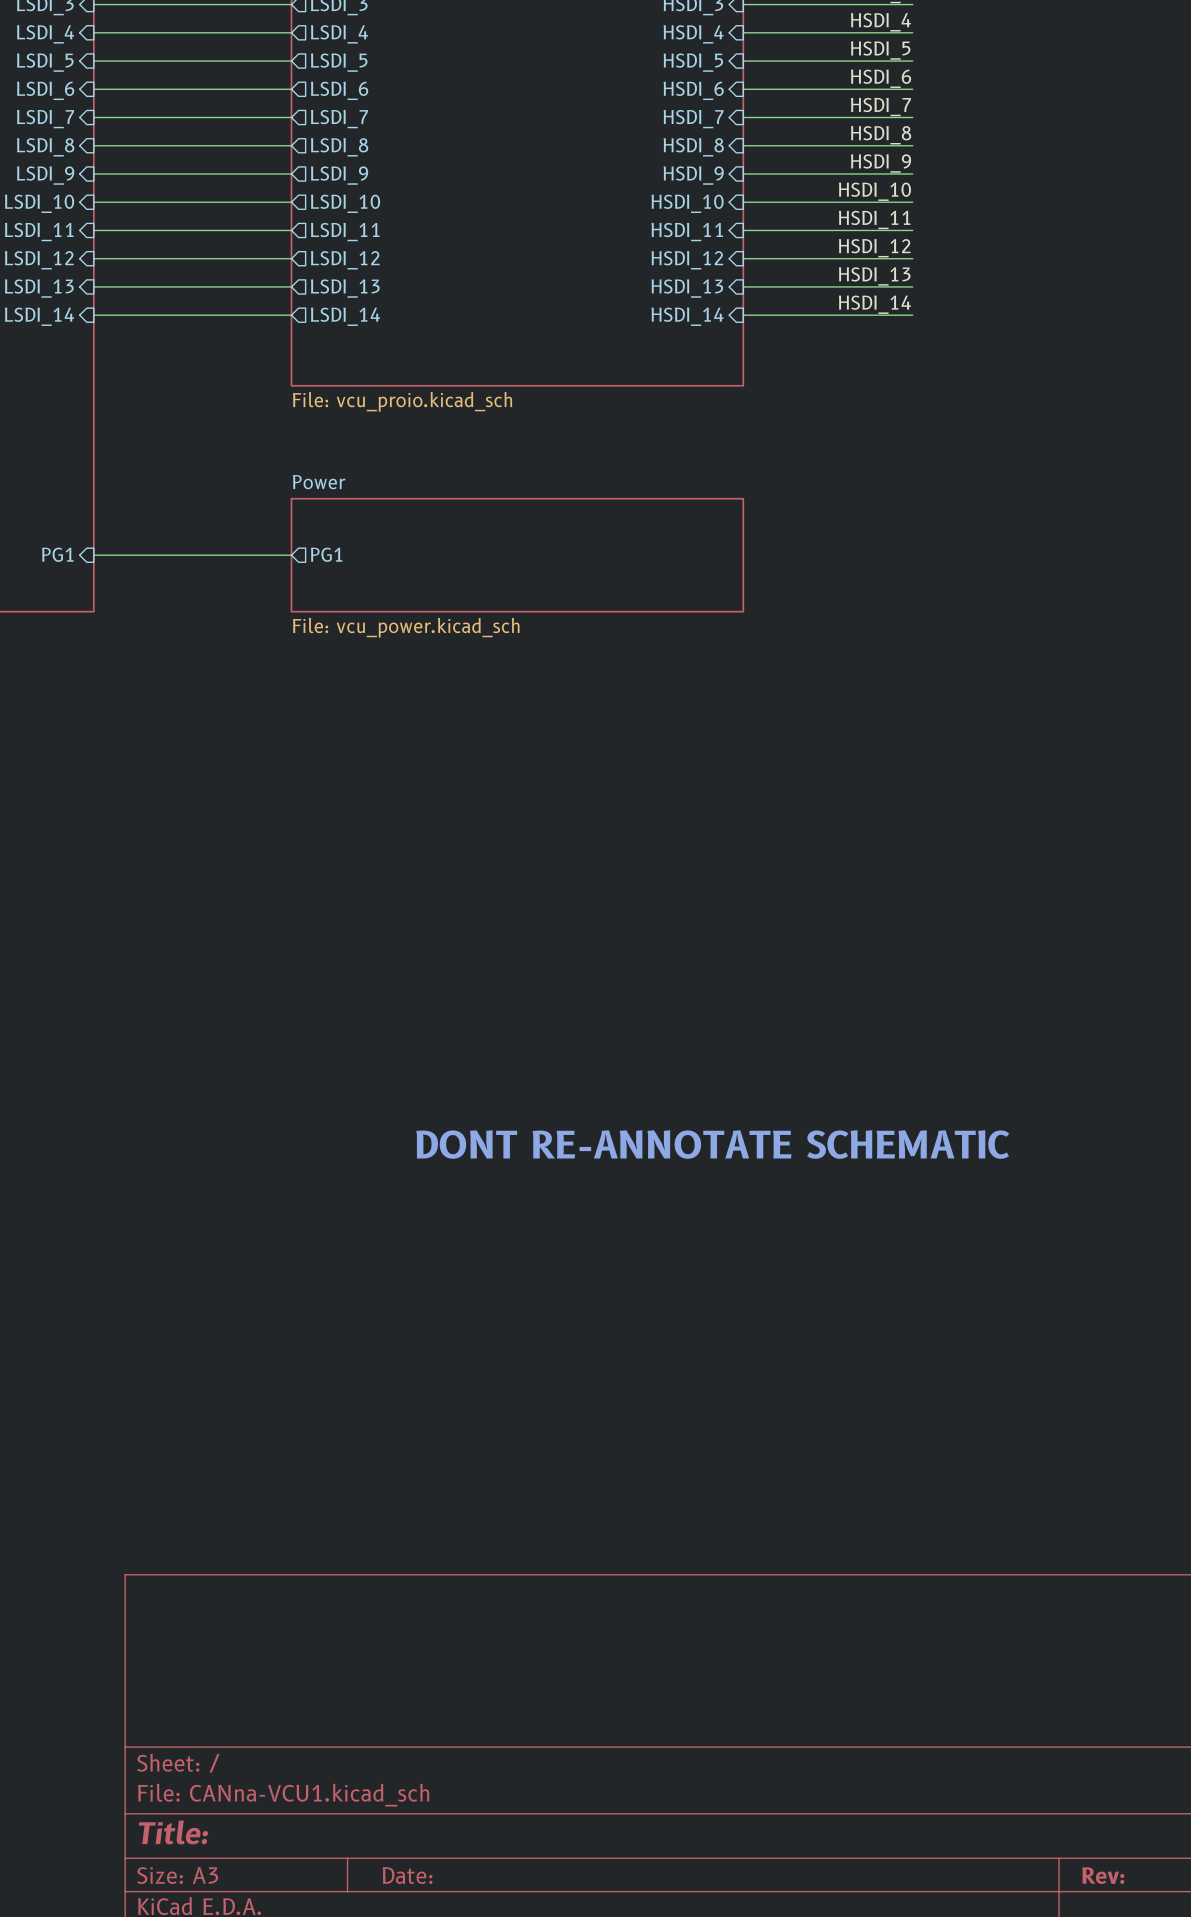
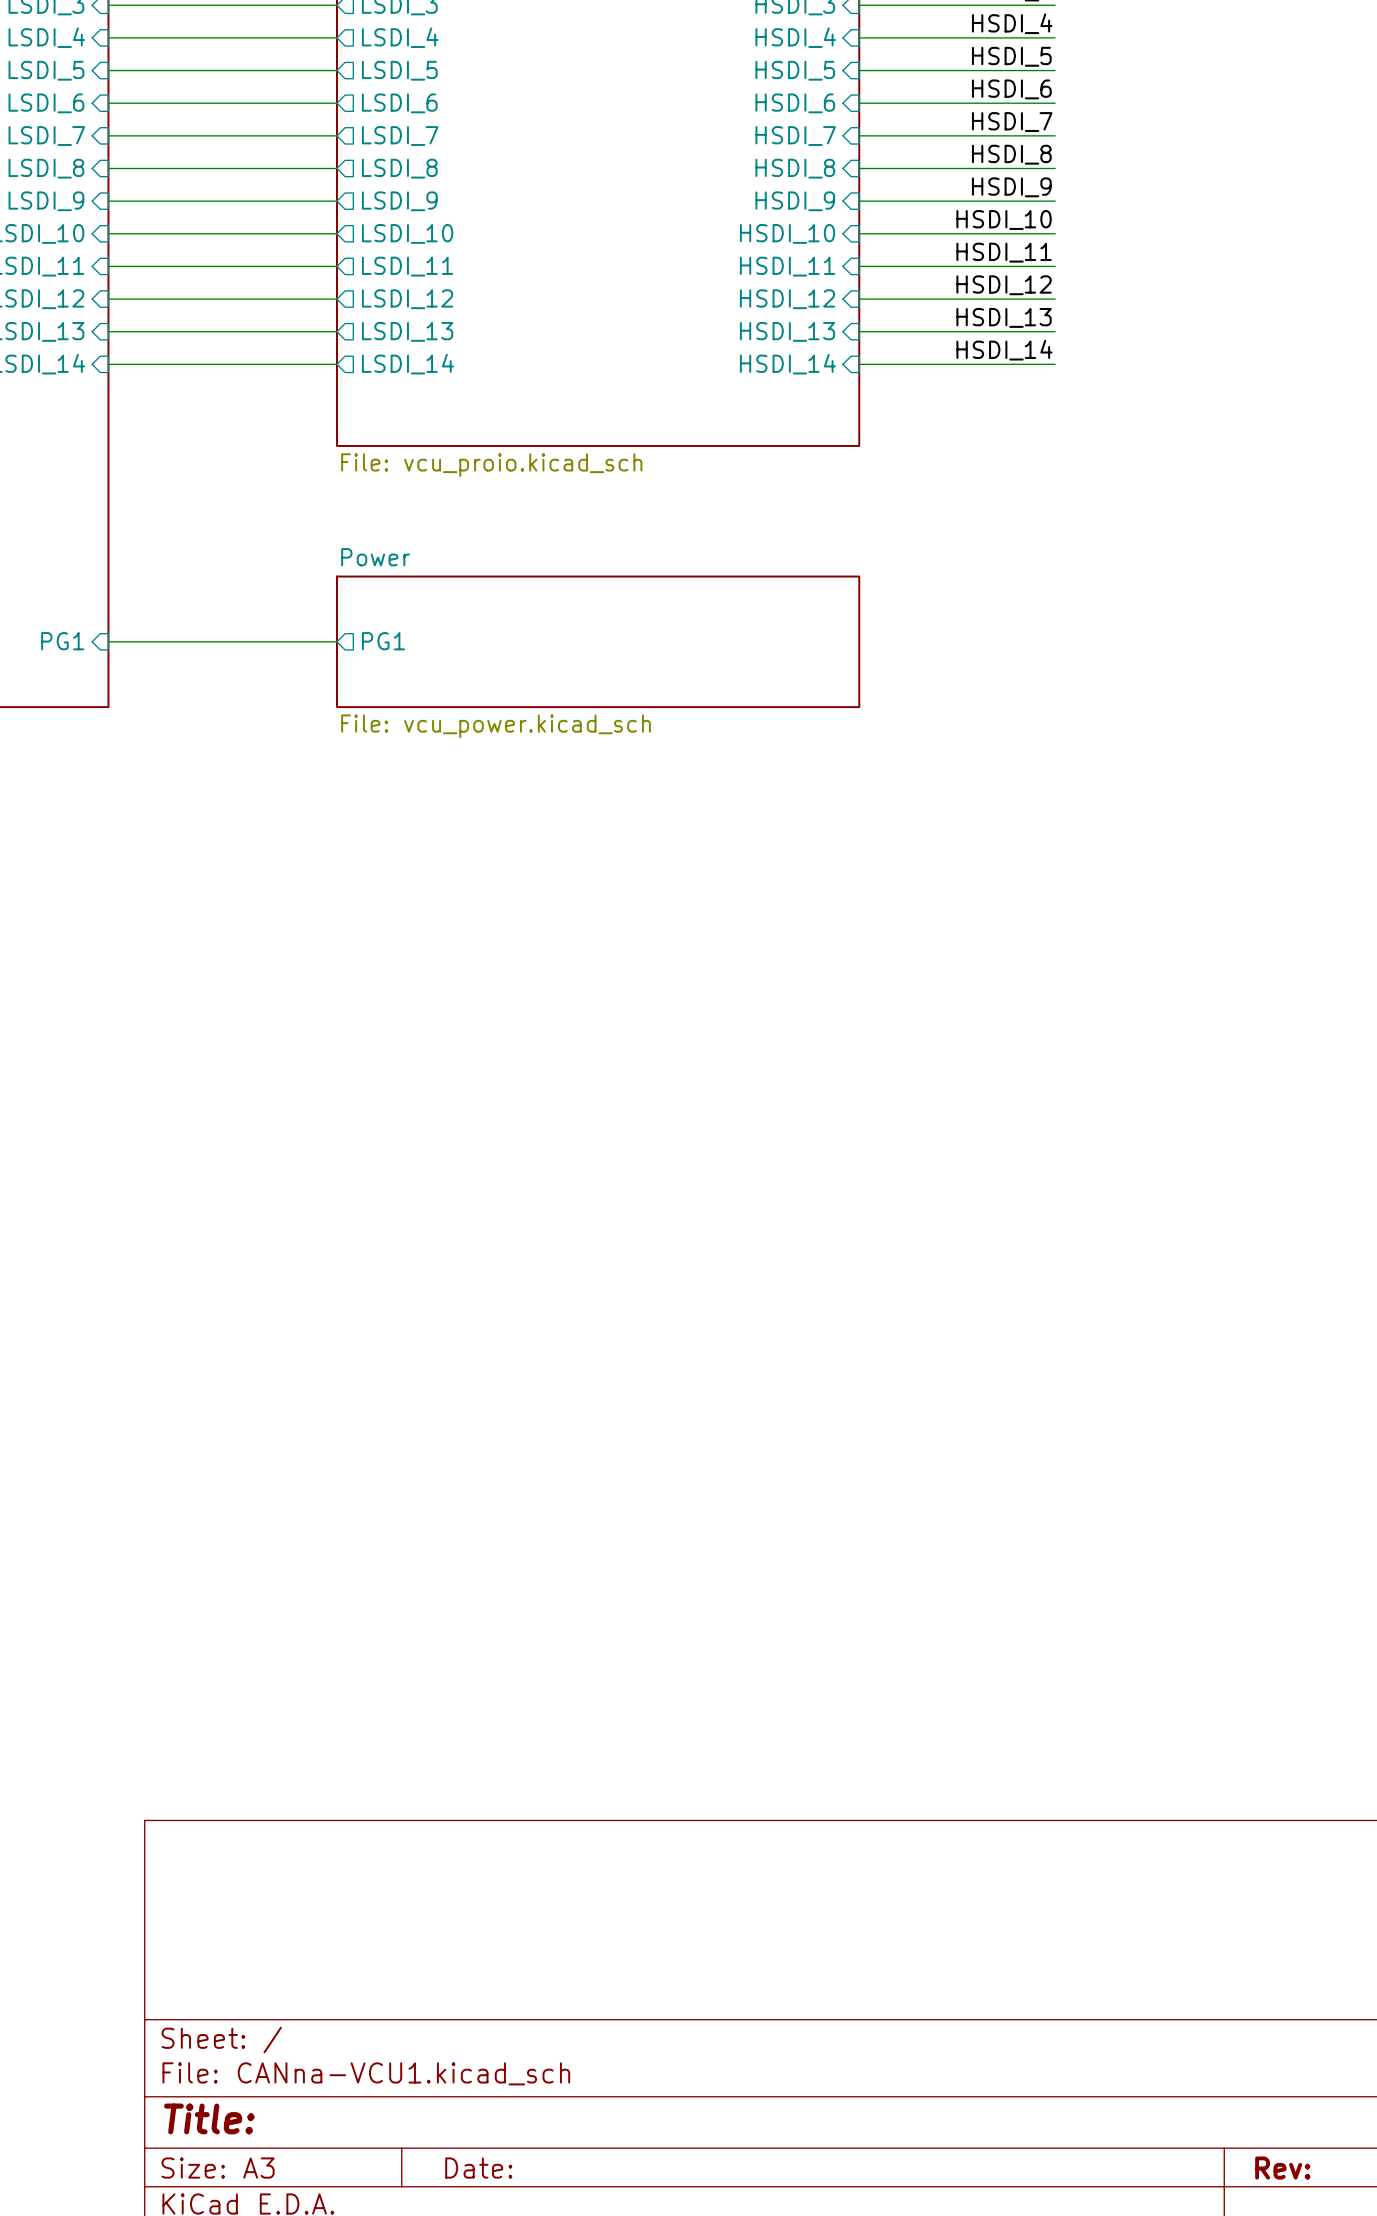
text: DONT RE-ANNOTATE SCHEMATIC (712, 1144) -> none

